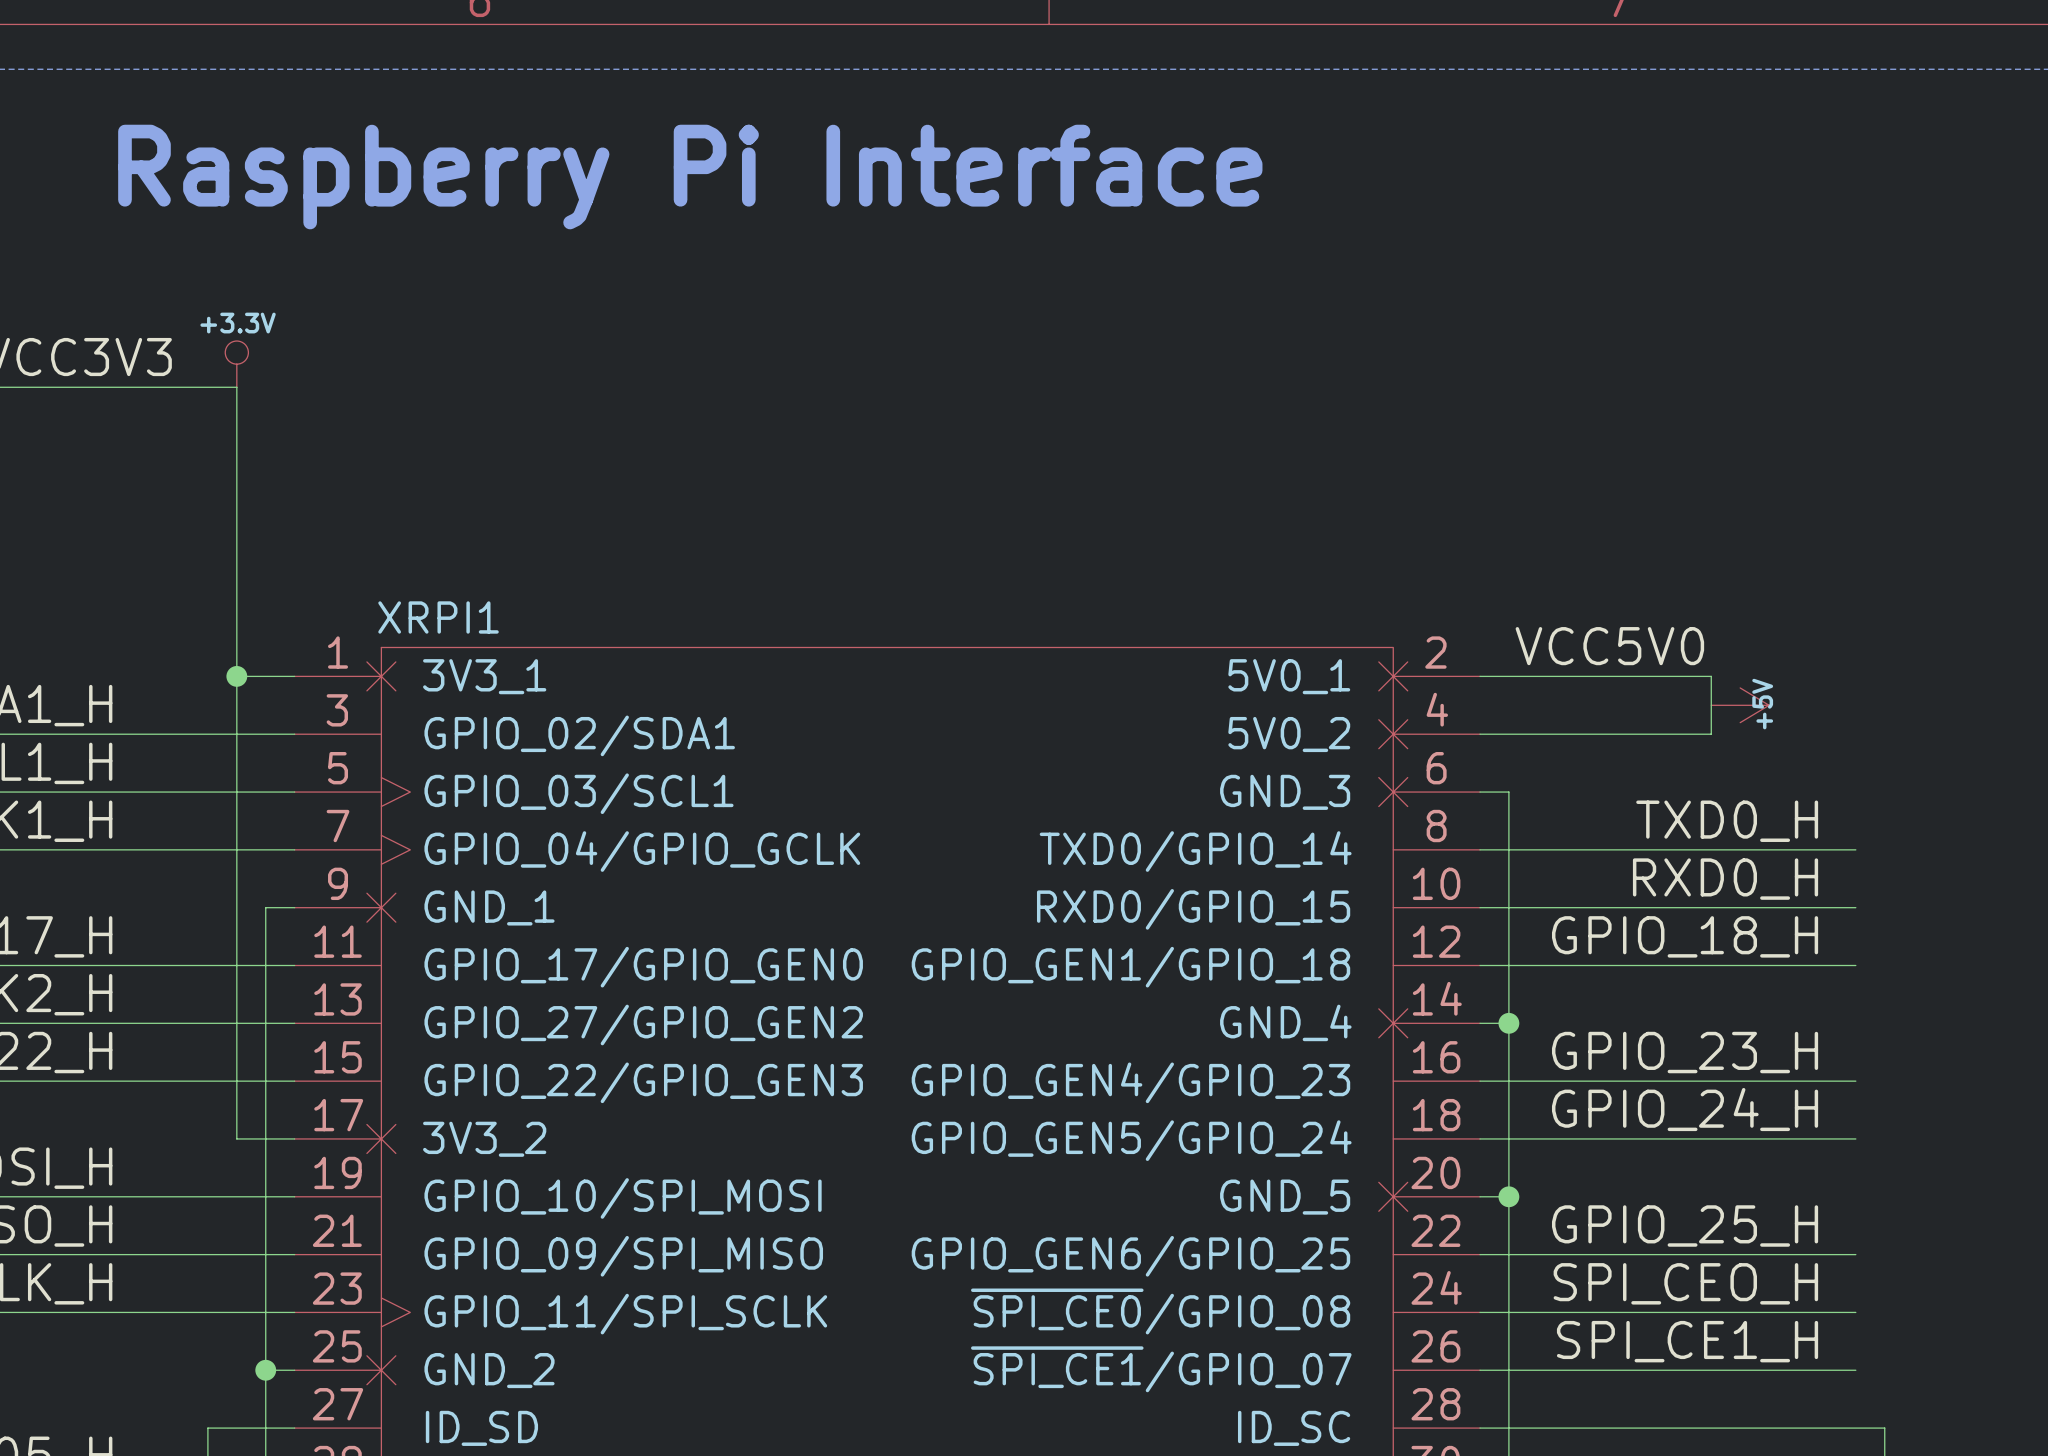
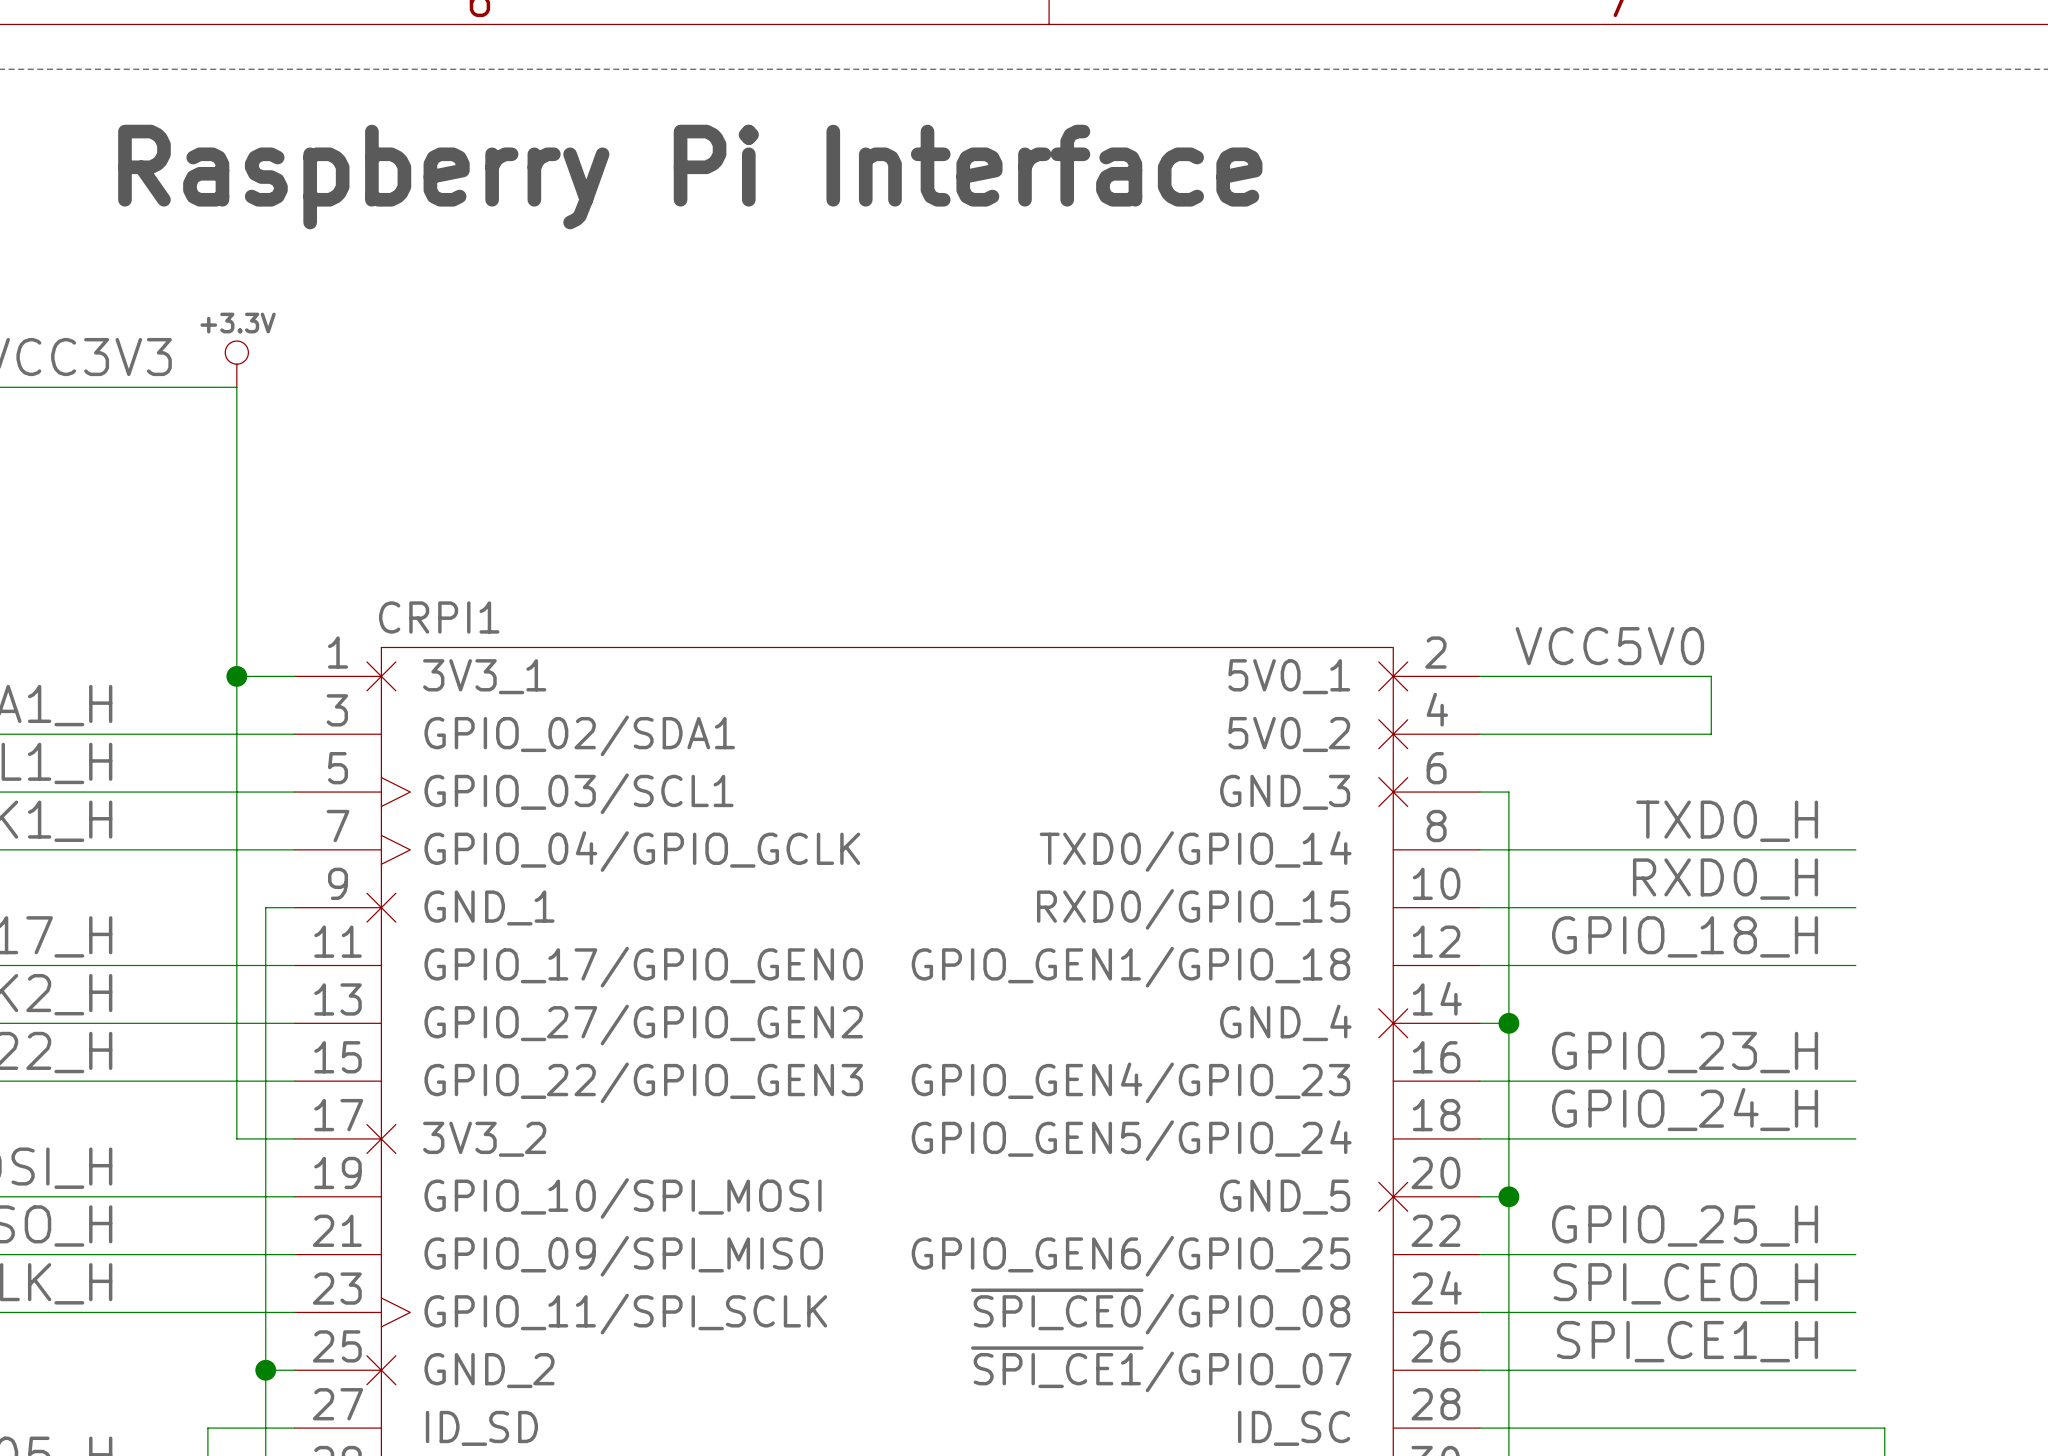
XRPI1 name: XRPI1 (438, 617) -> CRPI1 (439, 617)
power symbol: +5V (1740, 705) -> none

